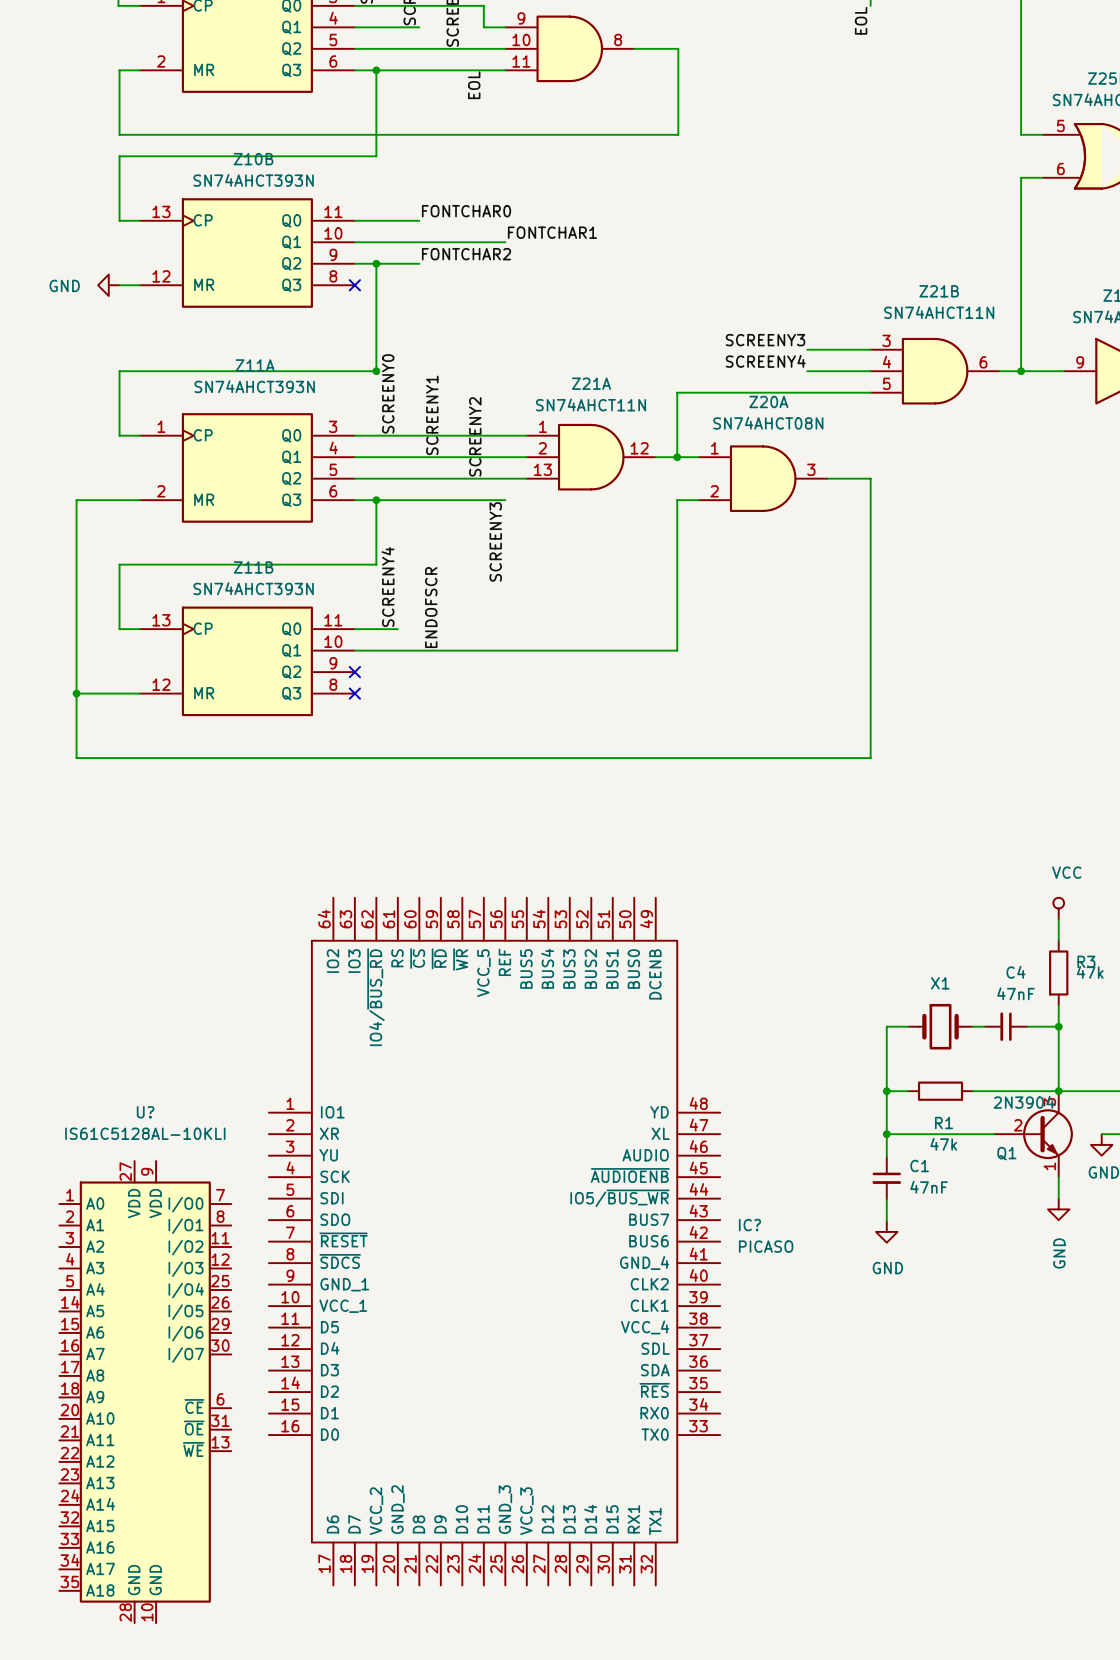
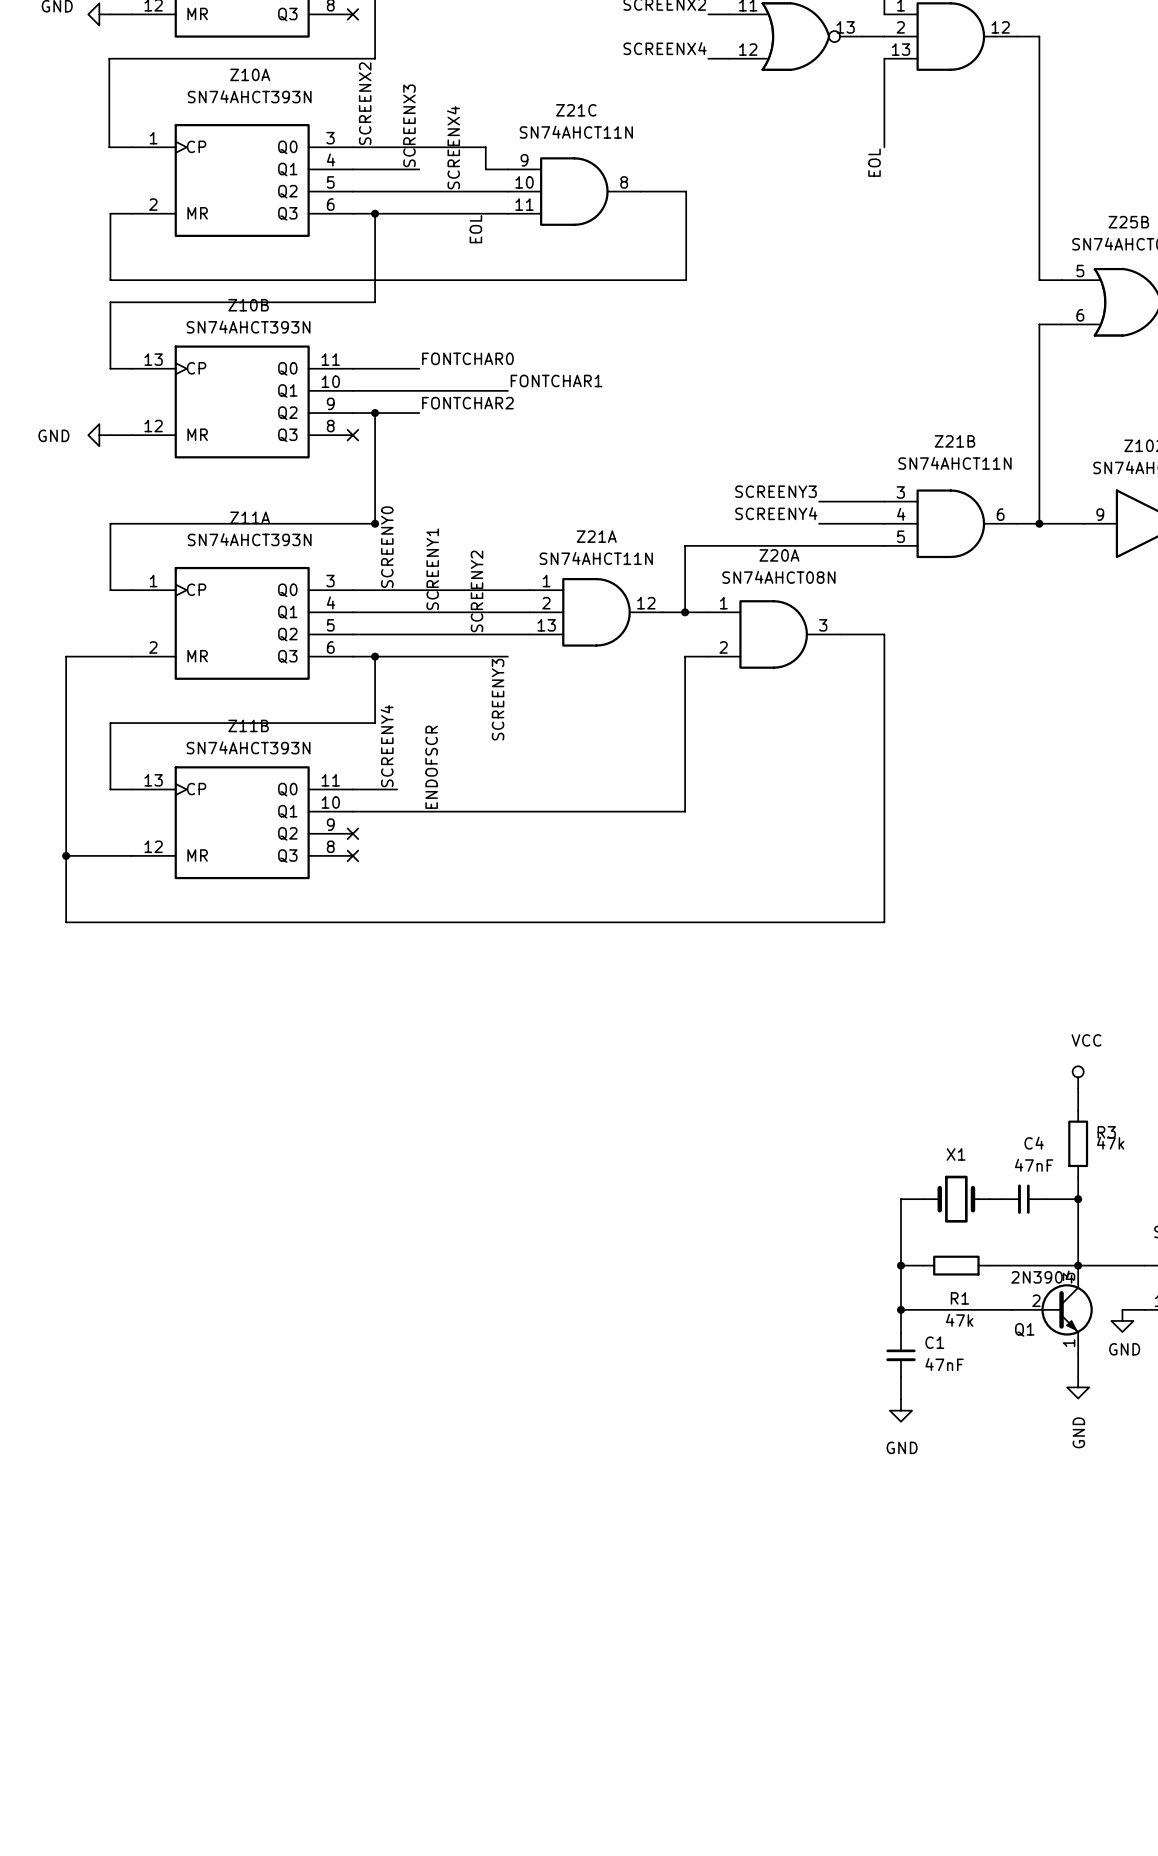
IC?: PICASO (494, 1241) -> none
U?: IS61C5128AL-10KLI (145, 1392) -> none

